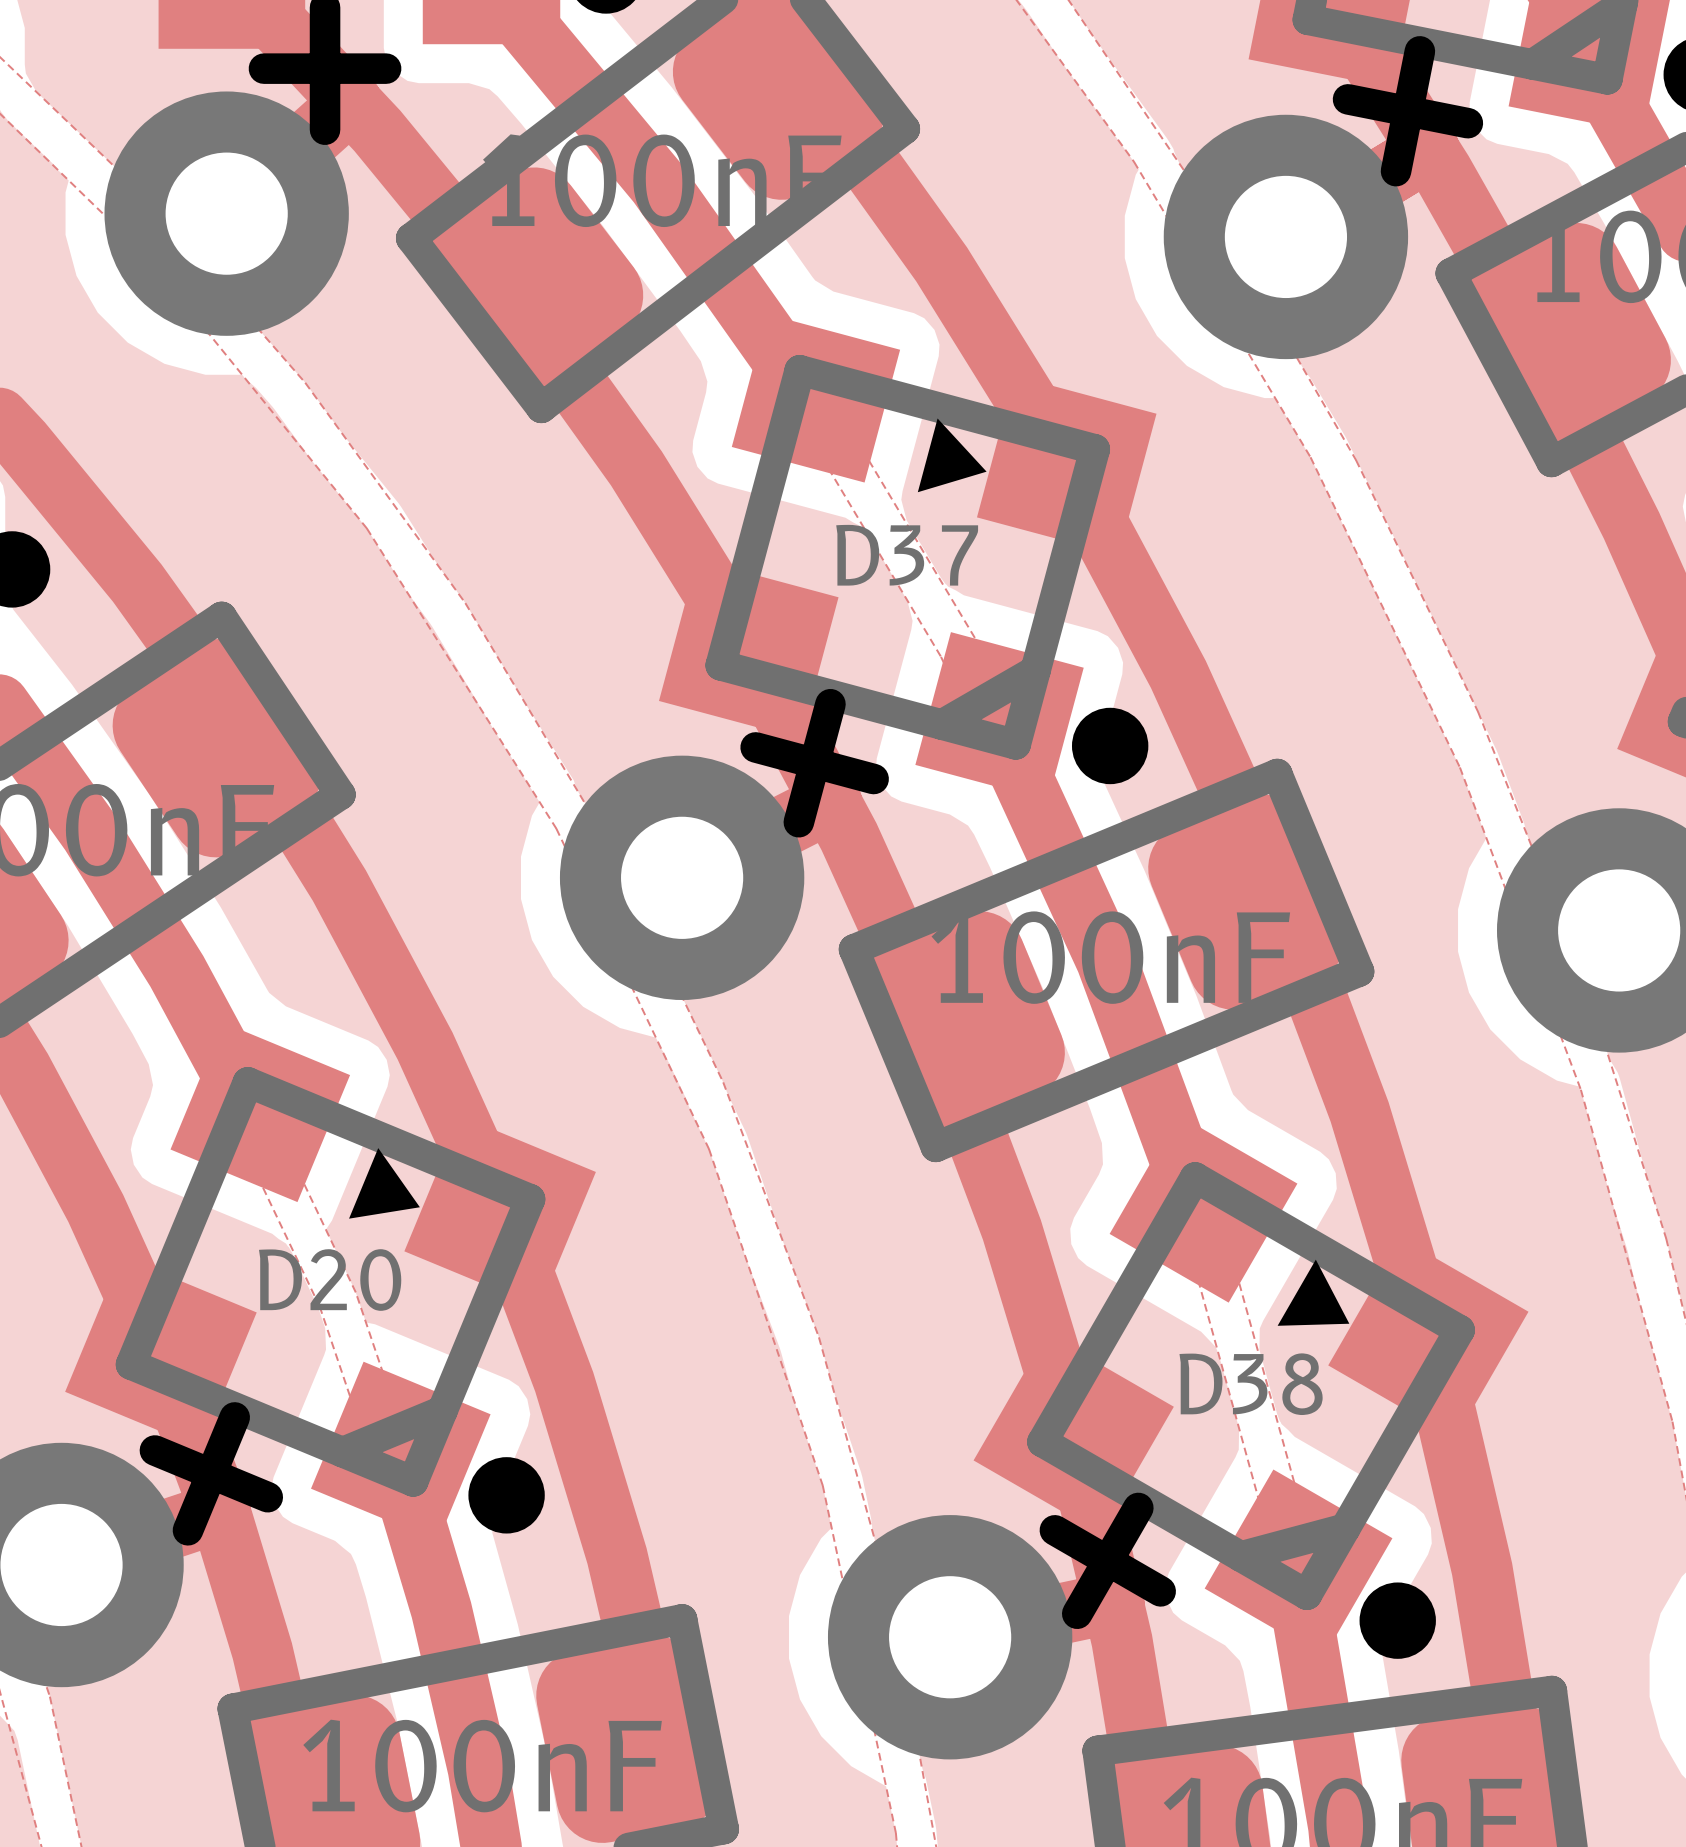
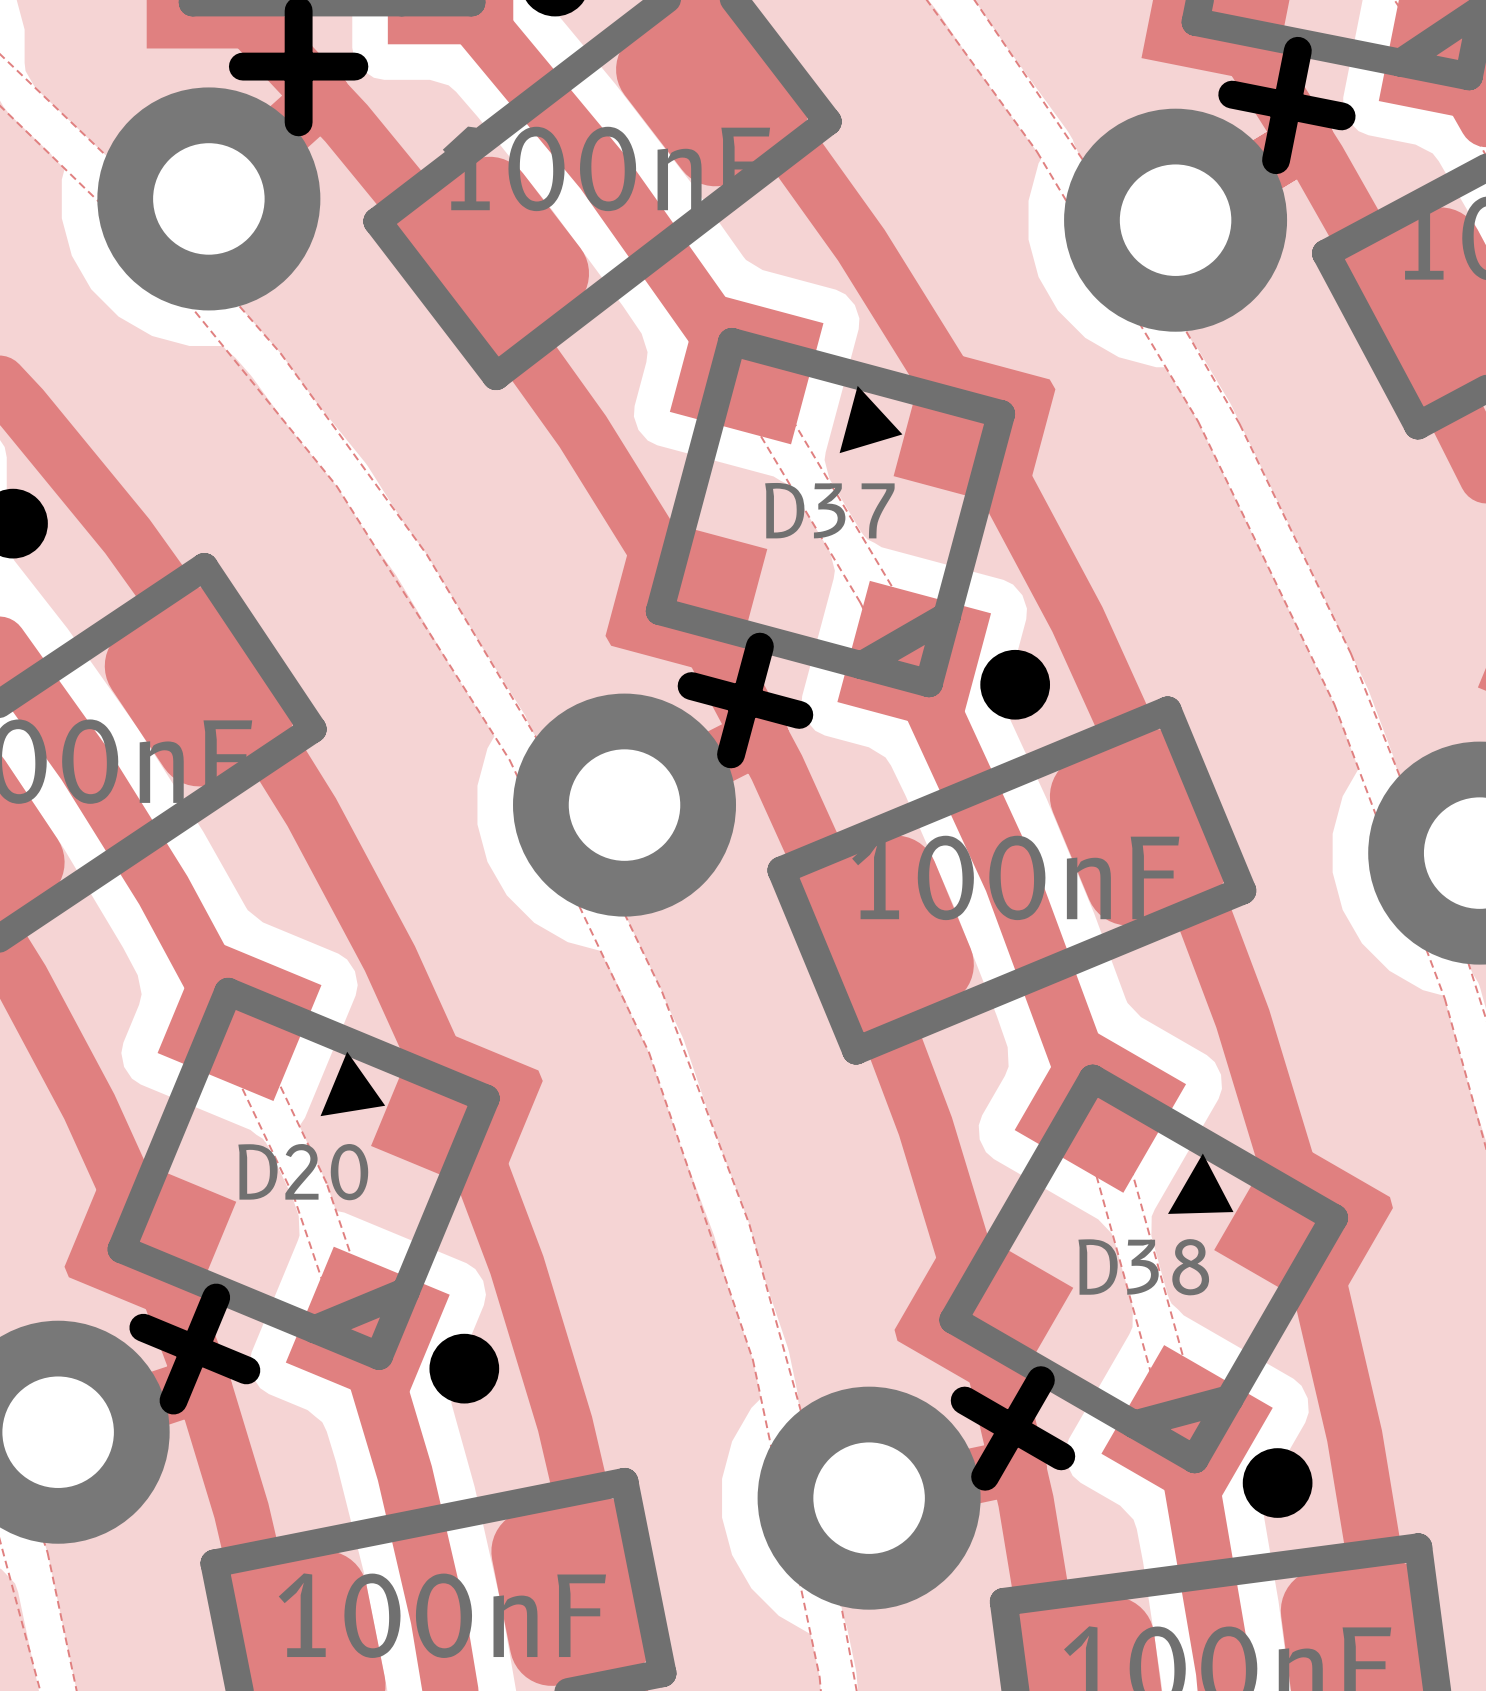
D37 footprint: [658, 316, 1157, 838] -> [605, 292, 1056, 769]
D20 footprint: [65, 1025, 596, 1546] -> [64, 940, 543, 1415]
D38 footprint: [973, 1119, 1529, 1659] -> [894, 1025, 1393, 1518]

